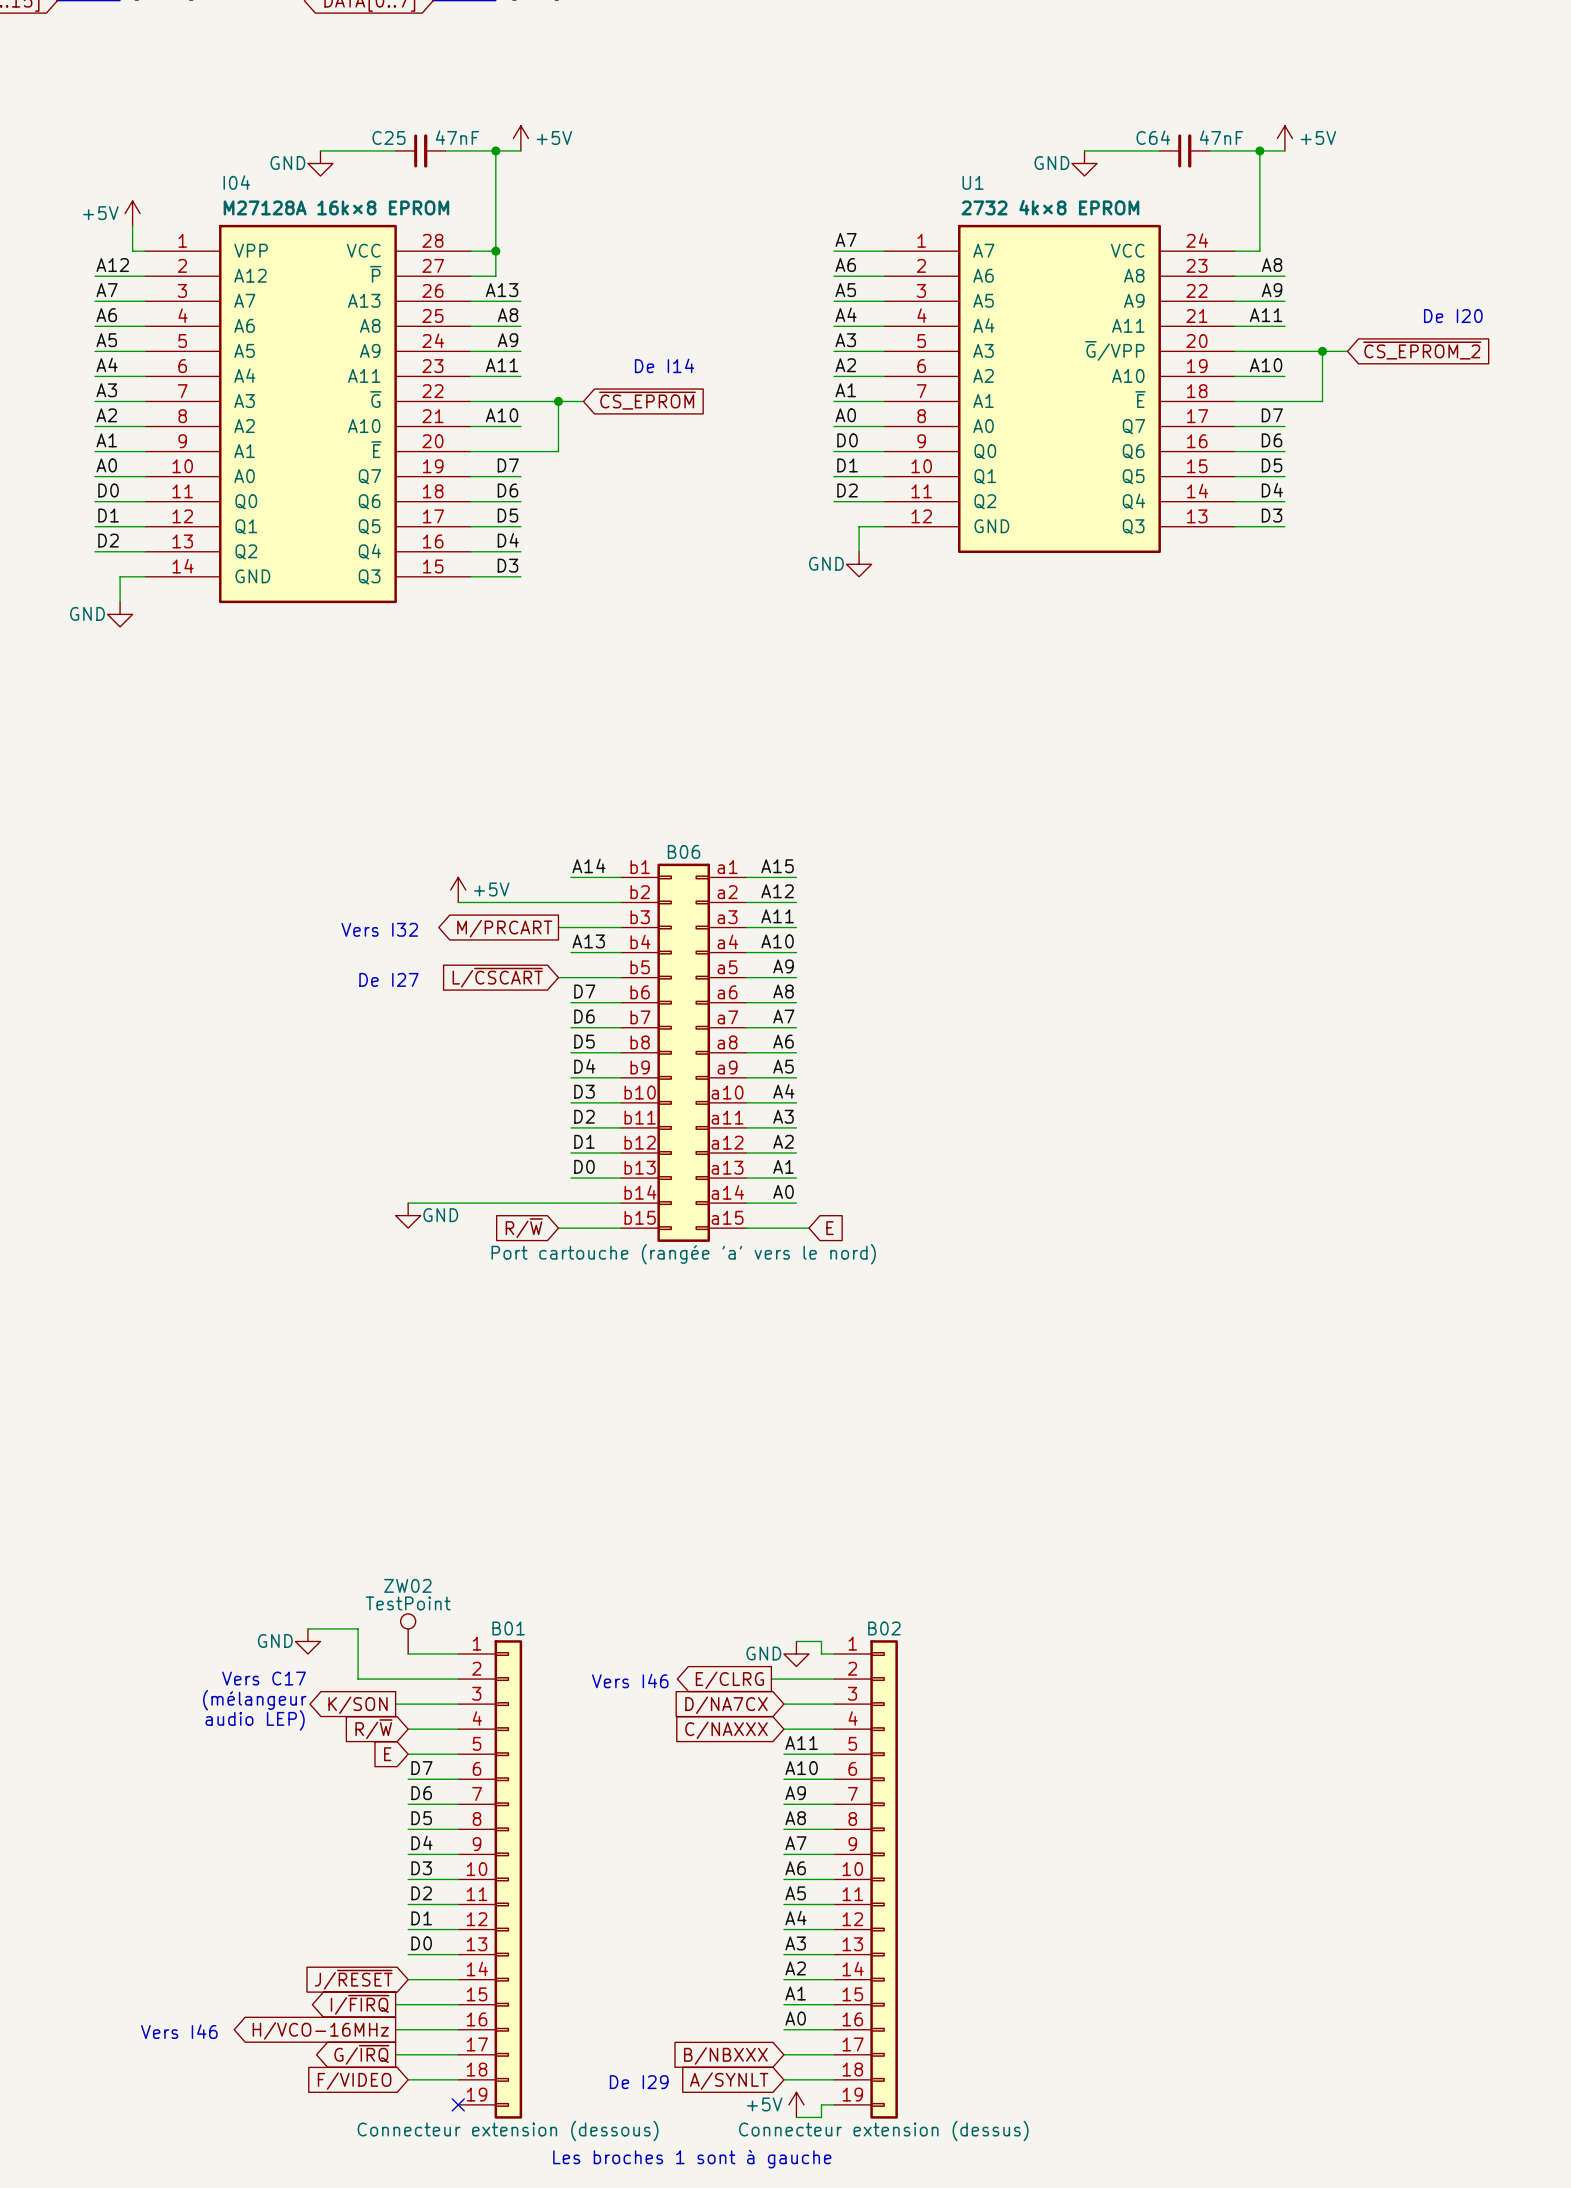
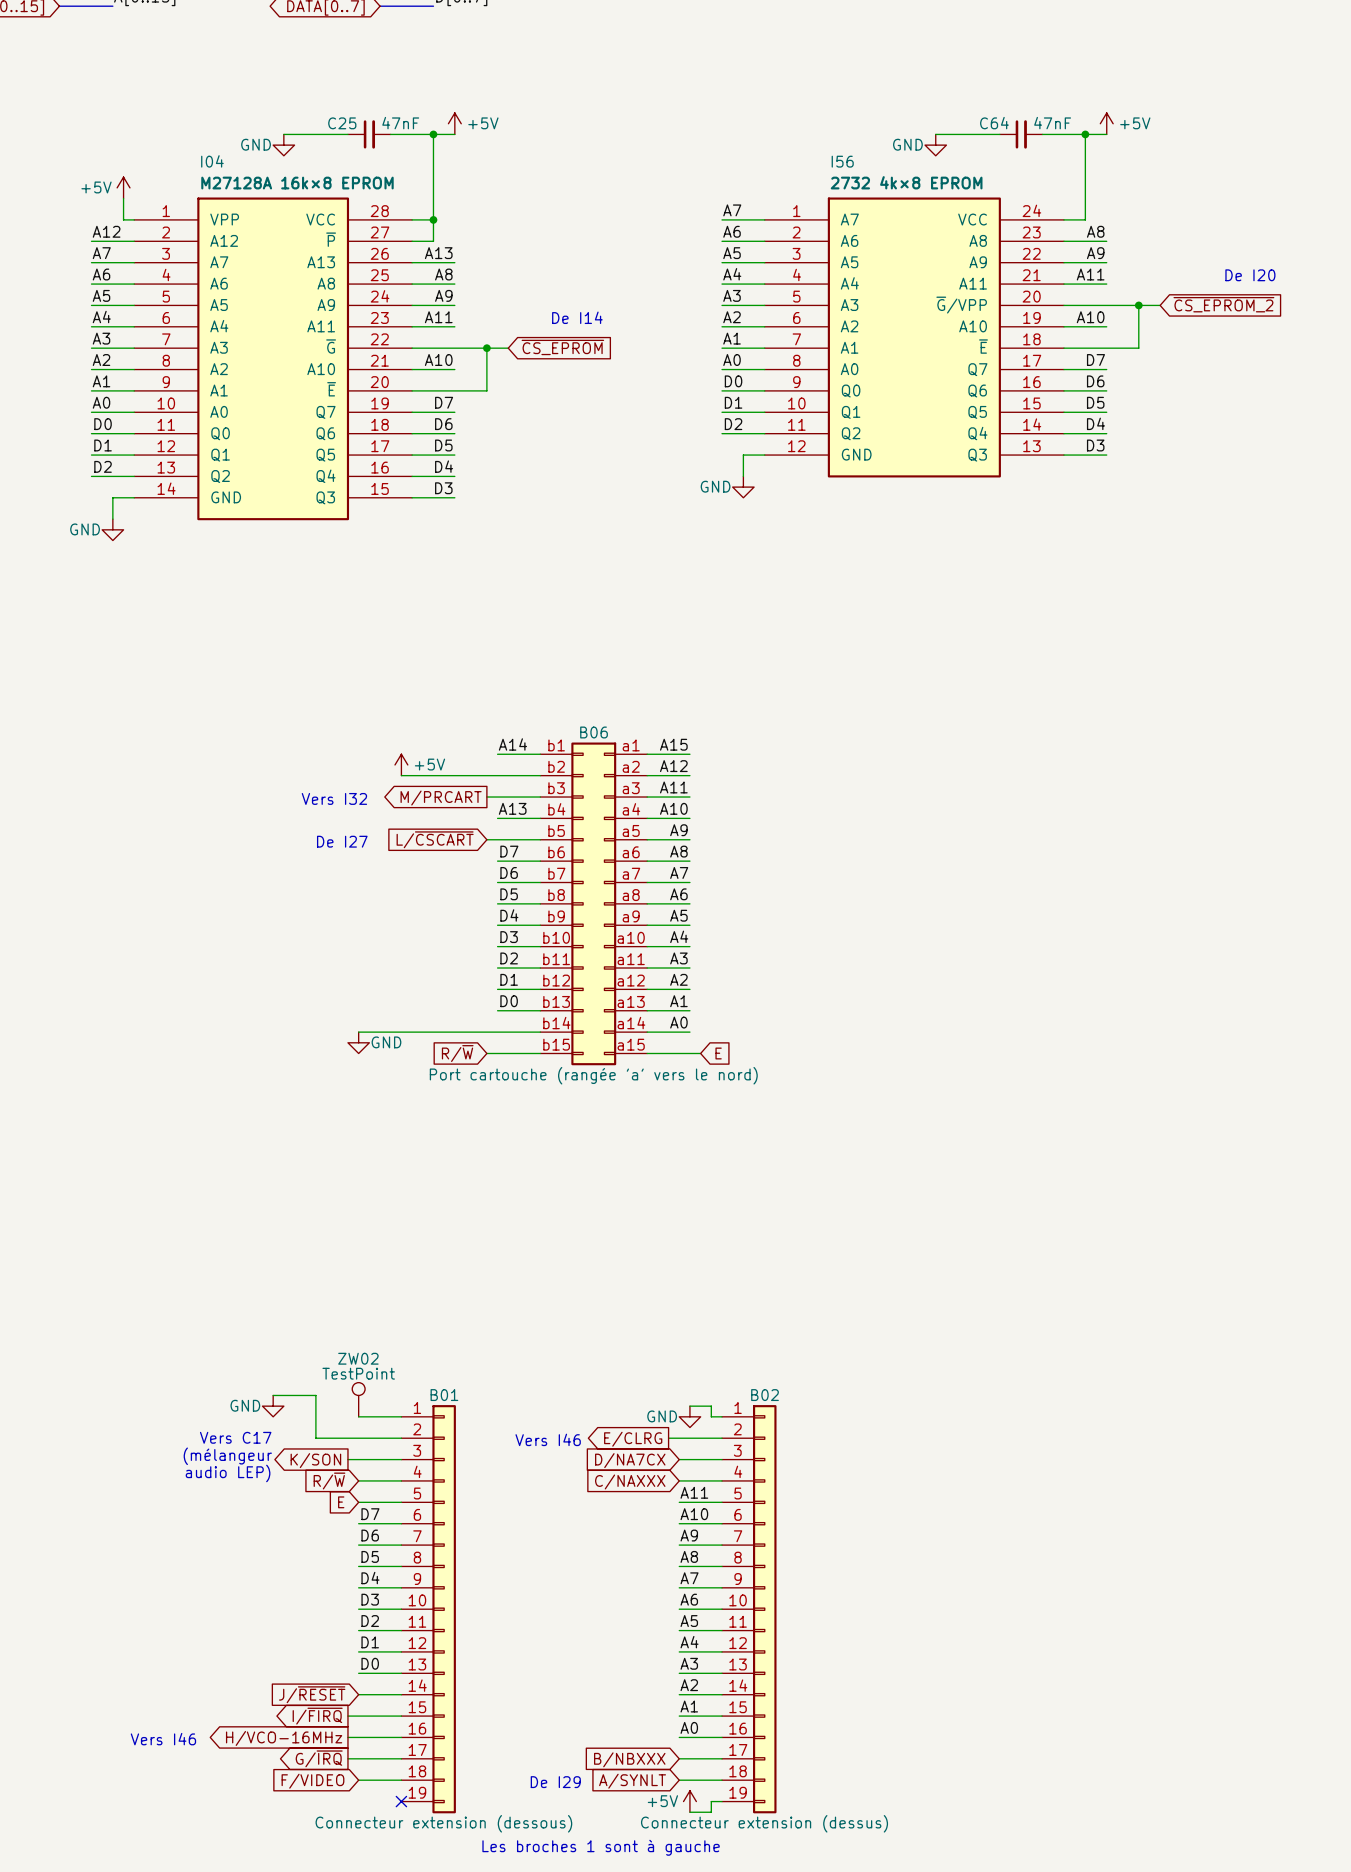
U1 name: U1 (973, 182) -> I56 (842, 161)

